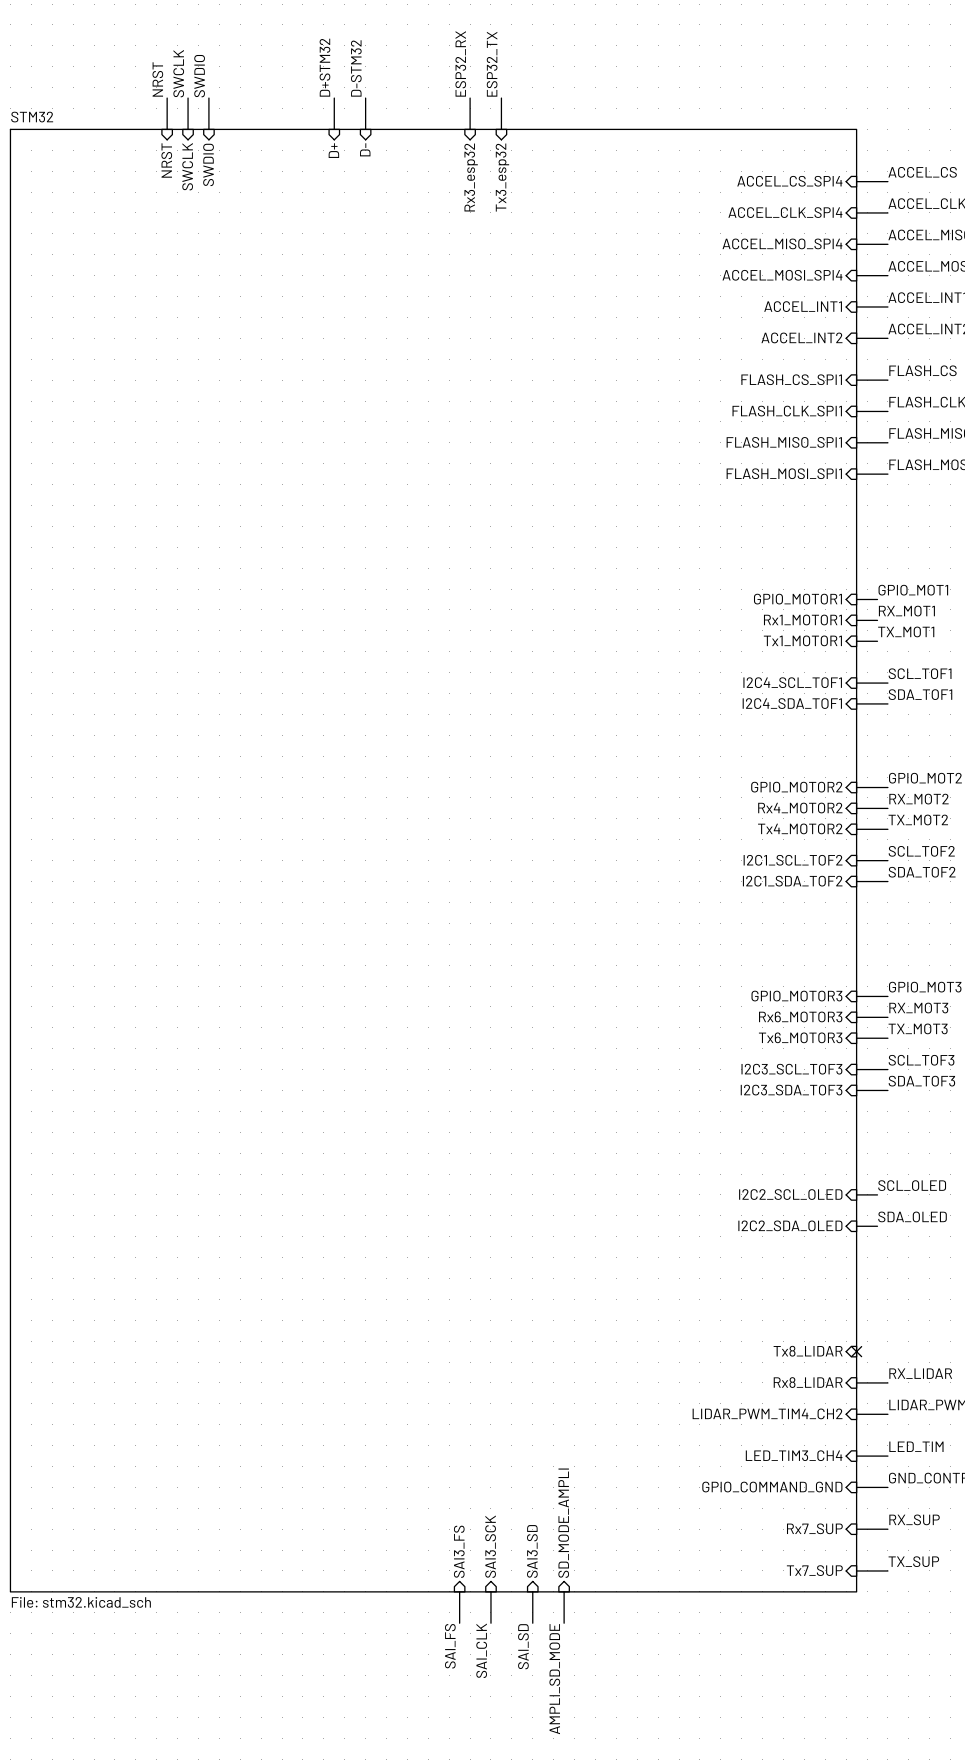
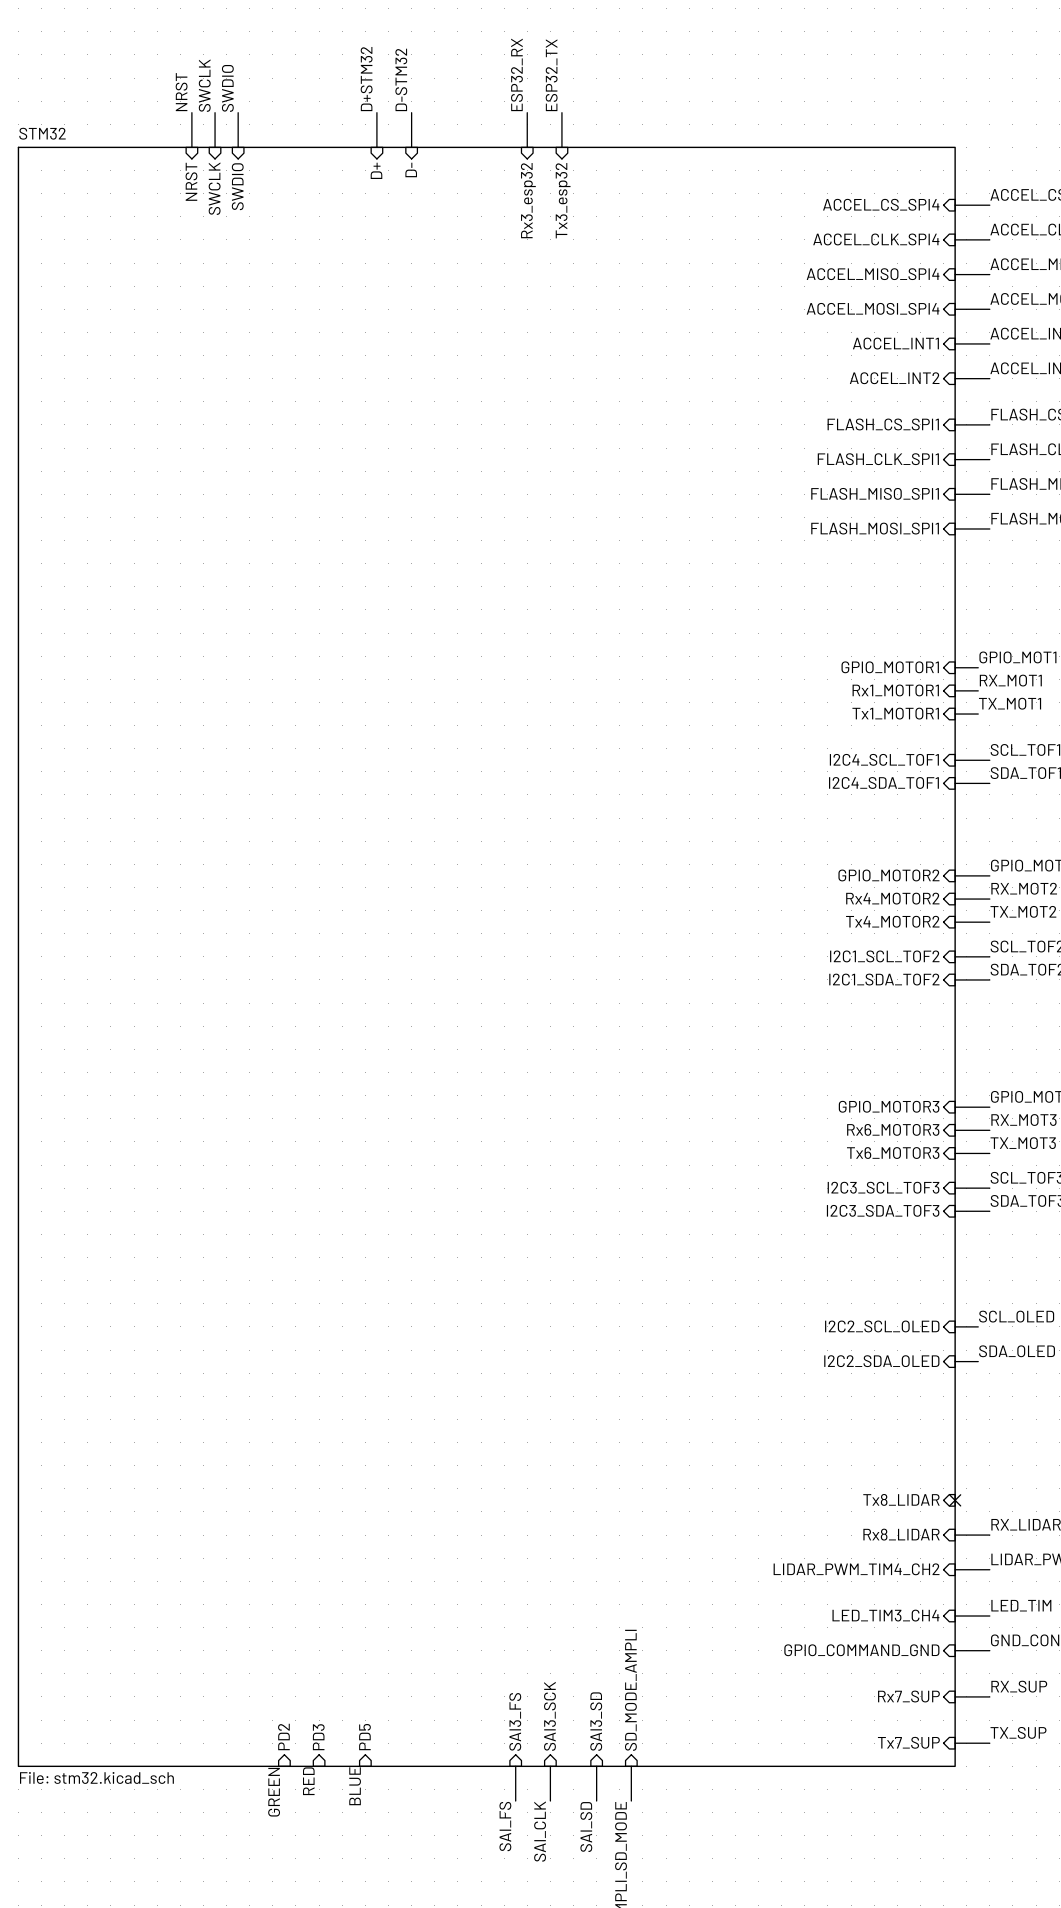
sheet pin: none -> PD2 (283, 1736)
sheet pin: none -> PD3 (318, 1737)
sheet pin: none -> PD5 (364, 1737)
label: none -> RED (308, 1781)
label: none -> BLUE (355, 1786)
label: none -> GREEN (274, 1792)

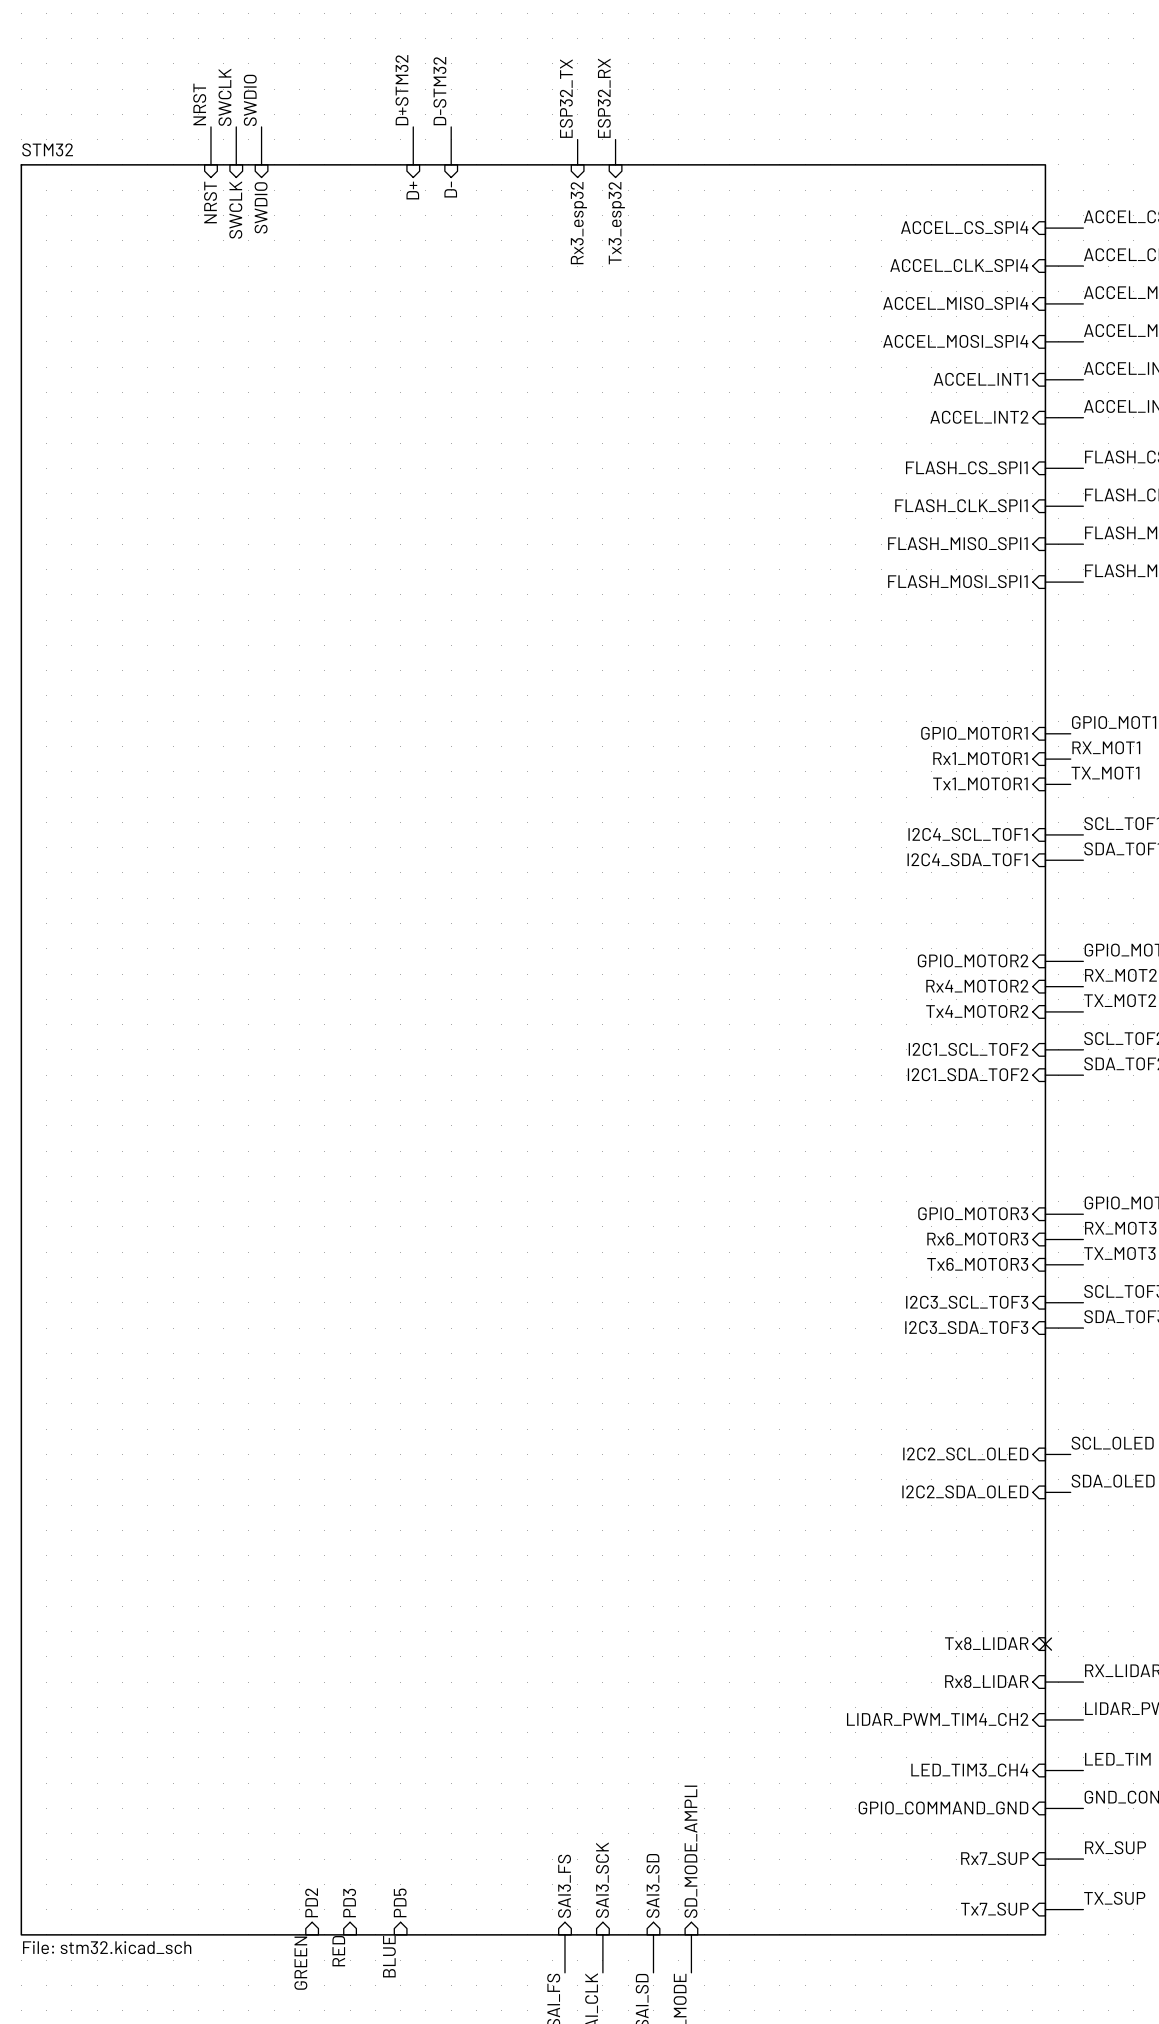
label position: ESP32_RX (516, 74) -> ESP32_RX (604, 98)
label position: ESP32_TX (551, 75) -> ESP32_TX (566, 98)
wire: (527, 112) (527, 124) -> none
wire: (561, 112) (561, 124) -> none

